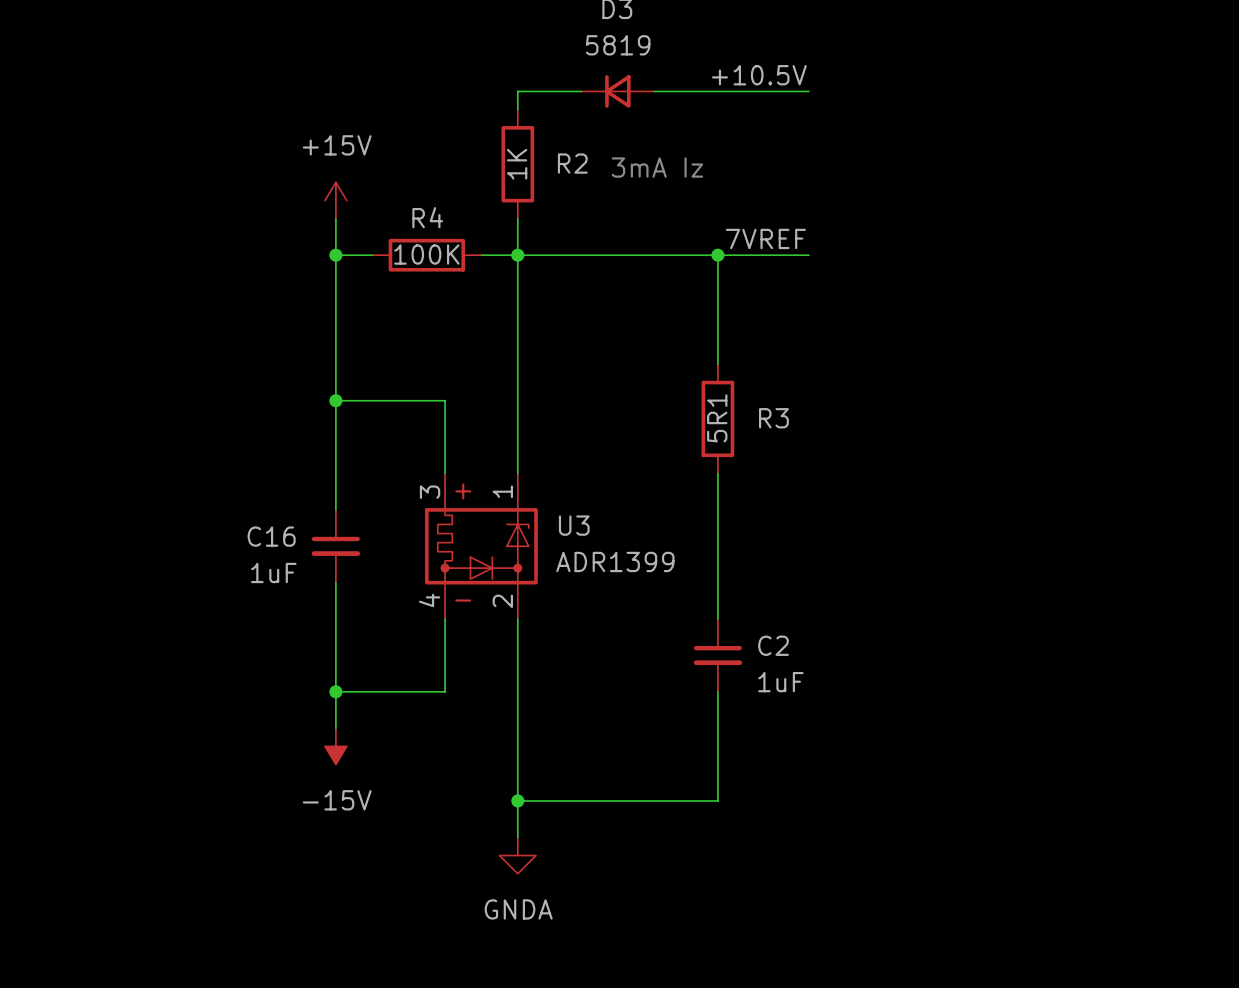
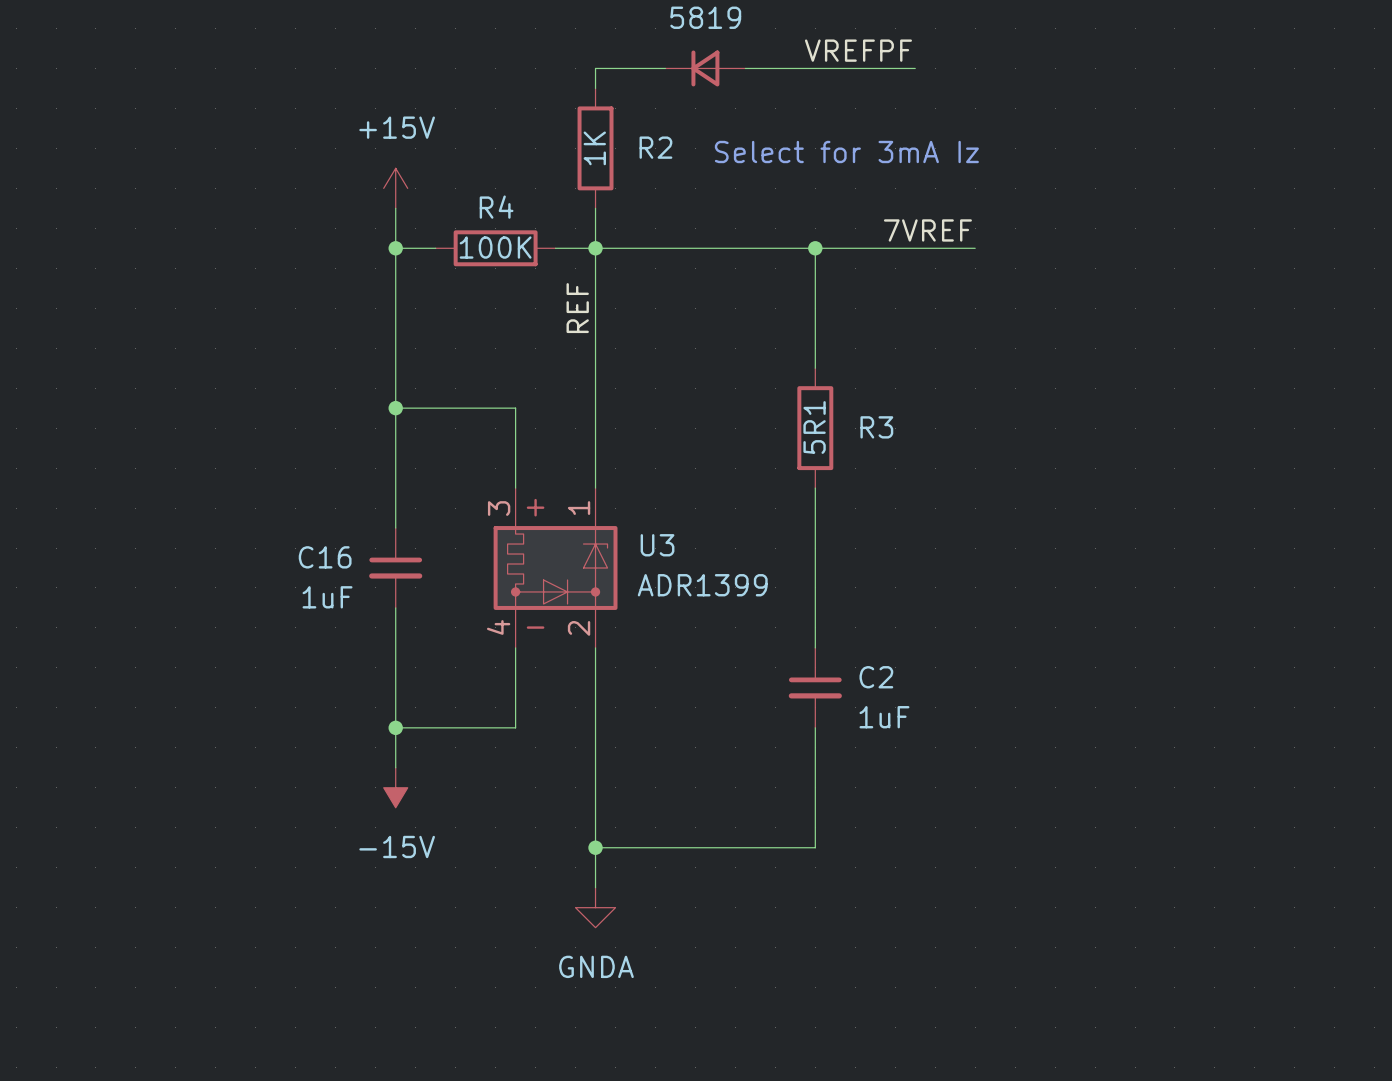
label: +10.5V (759, 75) -> VREFPF (858, 50)
text: 3mA Iz (657, 167) -> Select for 3mA Iz (846, 151)
label position: 7VREF (765, 238) -> 7VREF (927, 230)
wire: none -> (915, 248) (975, 248)
label: none -> REF (577, 308)

